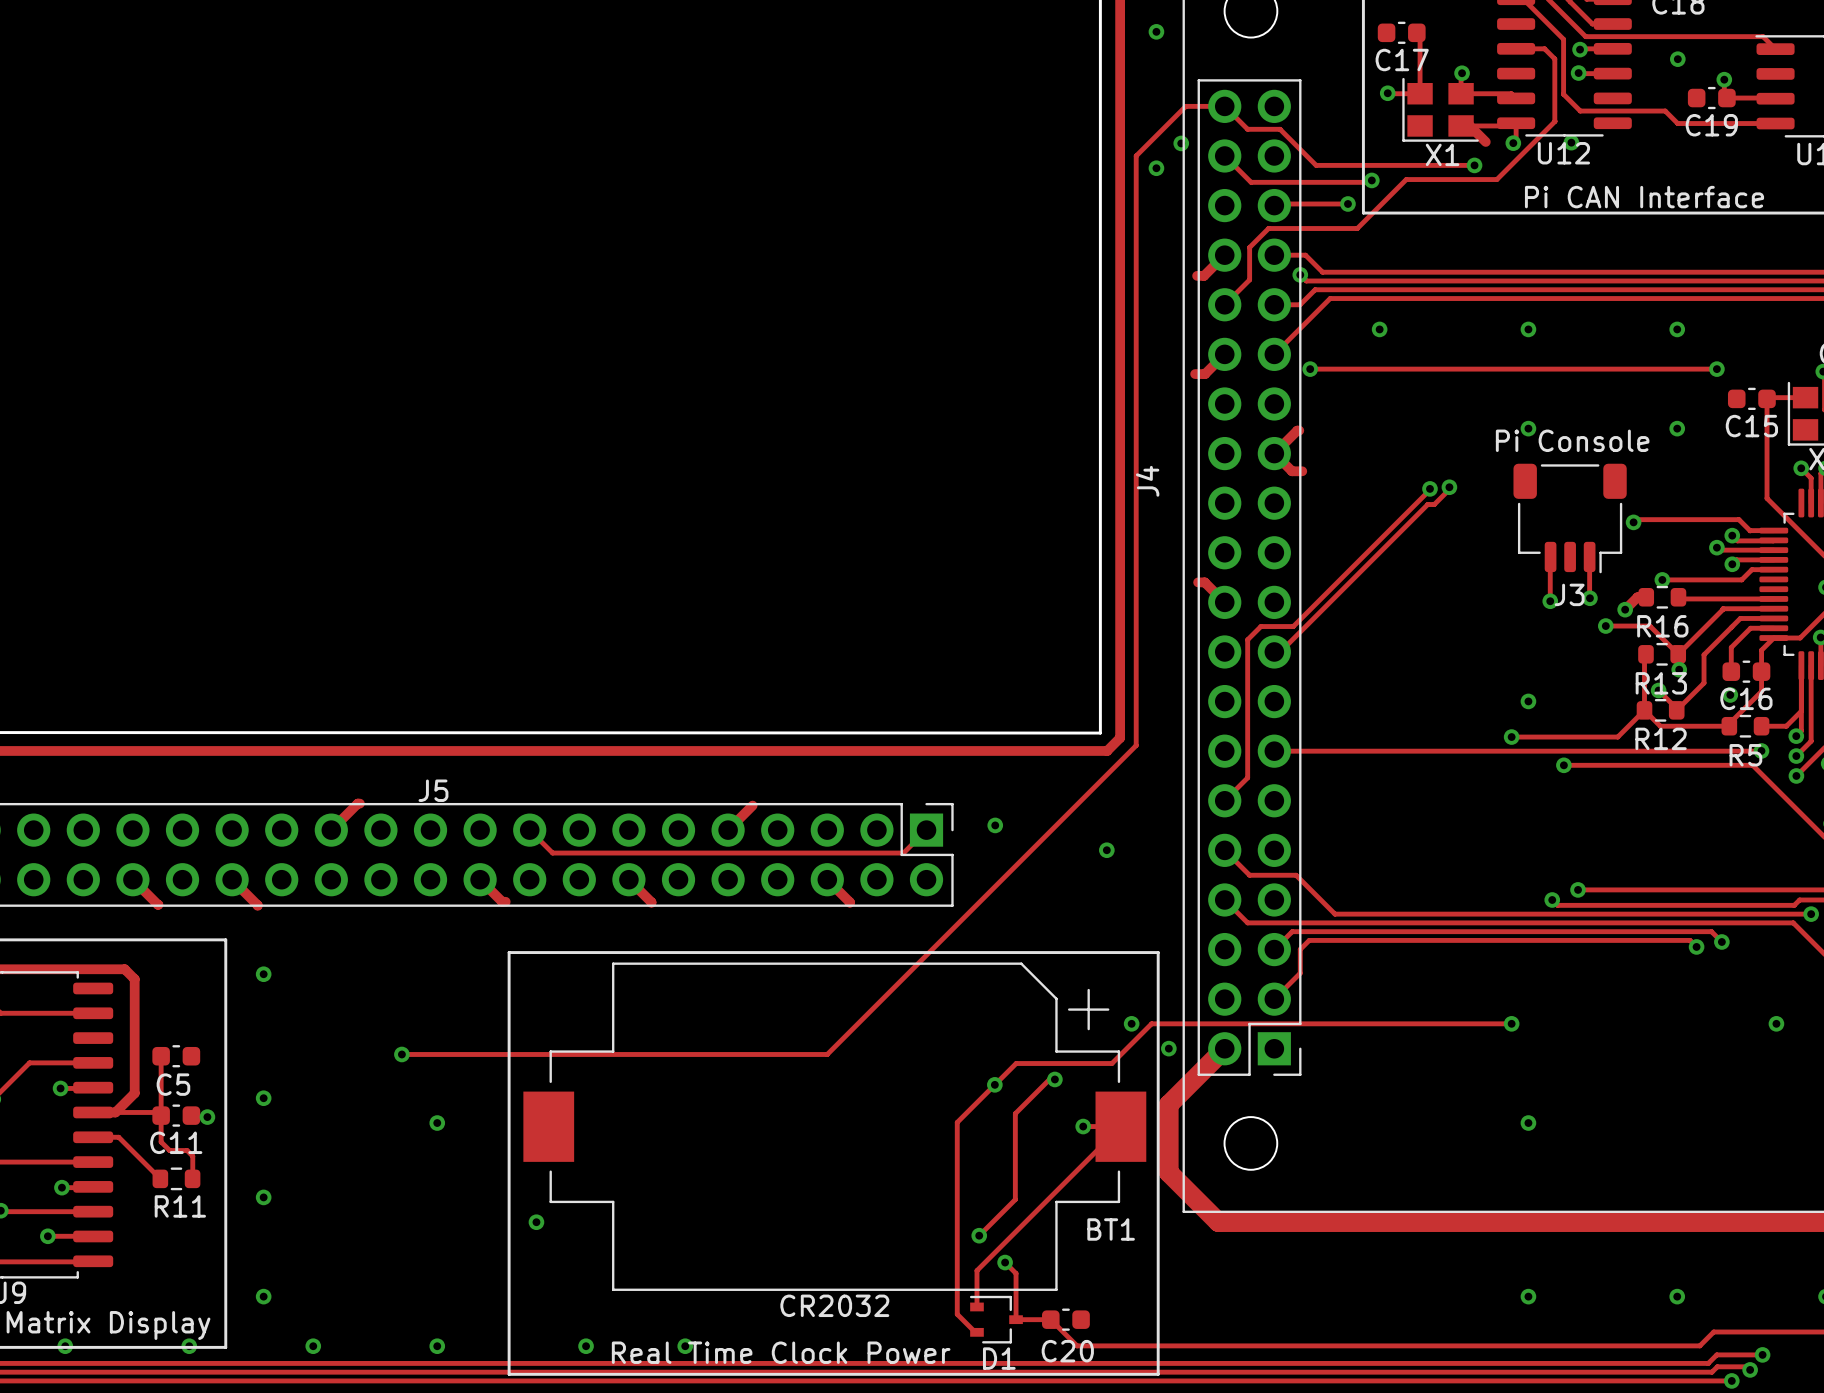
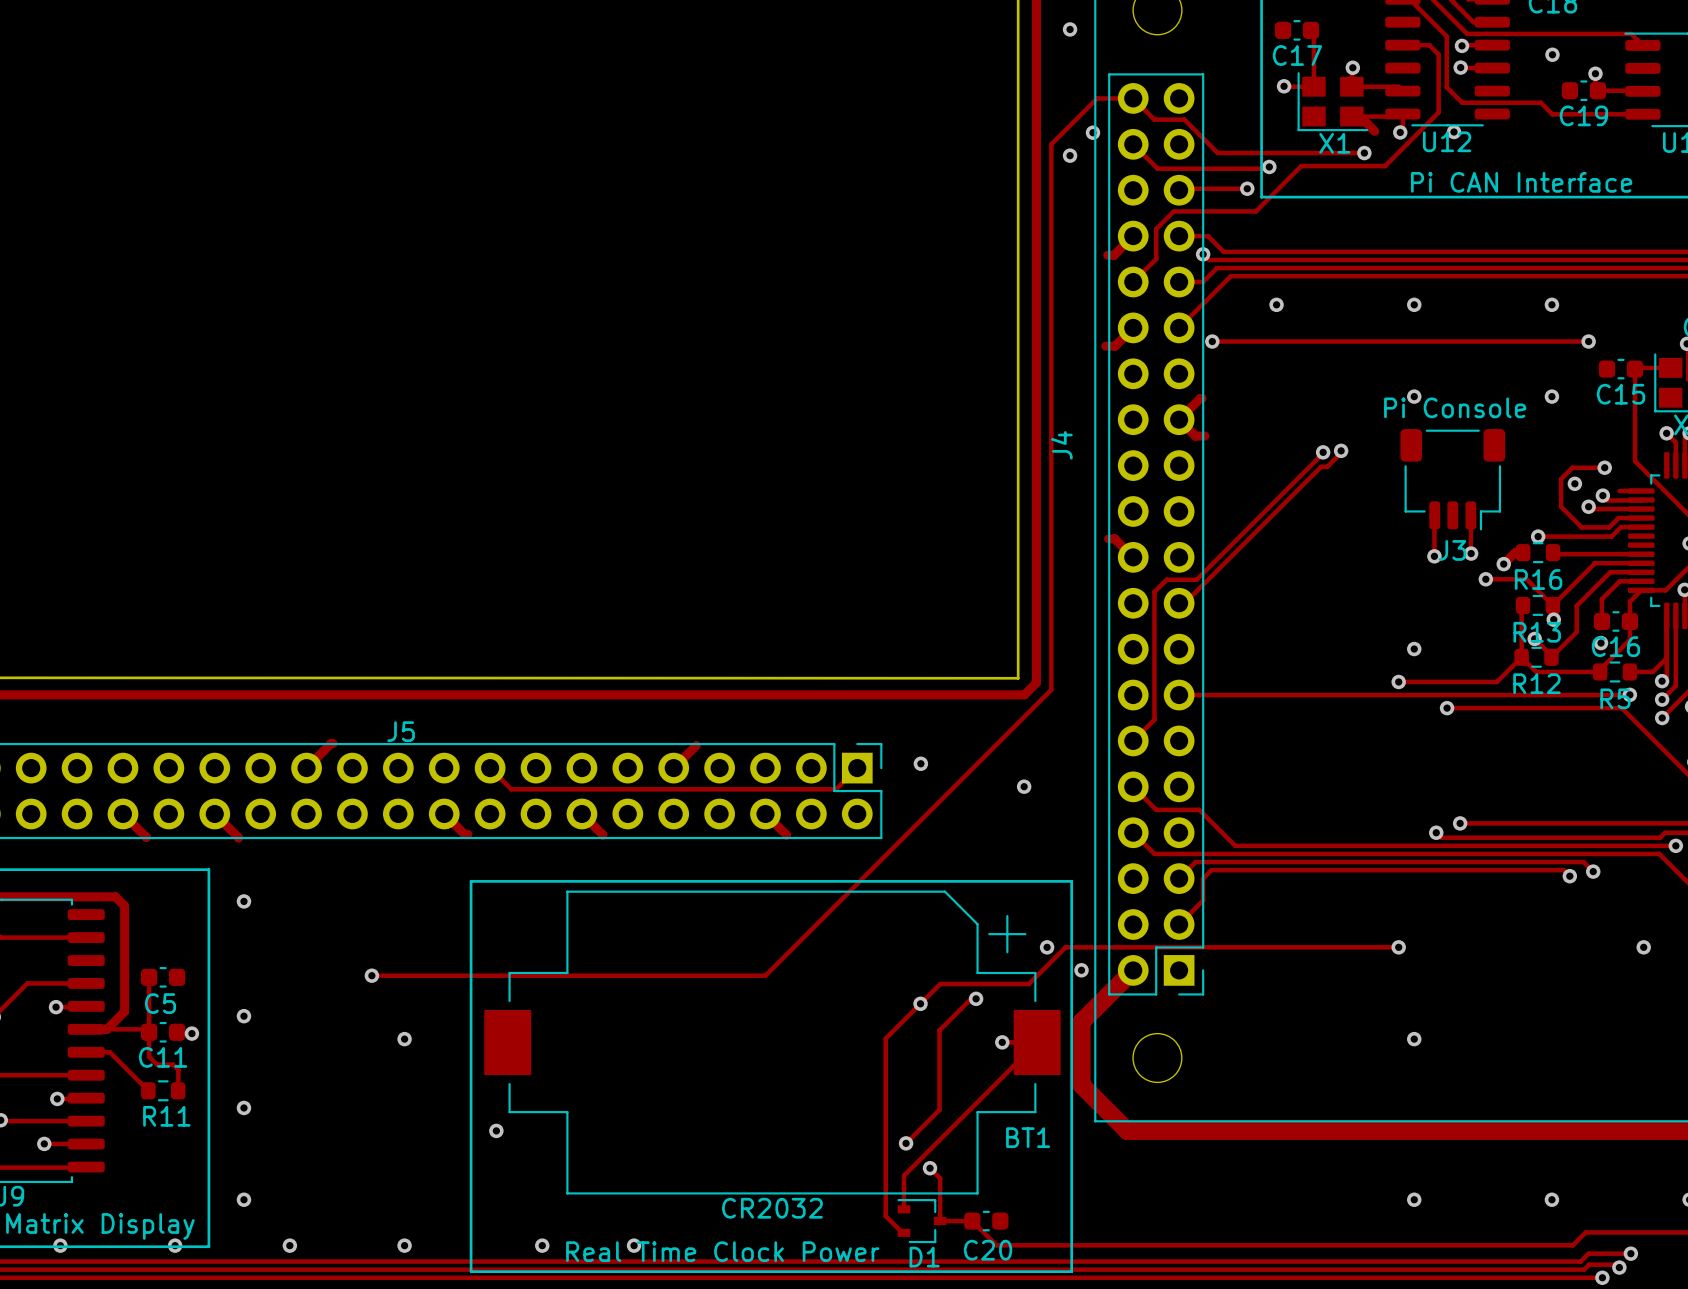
via: none -> (1604, 467)
track: (1633, 522) (1636, 519) (1738, 519) (1750, 530) -> none
via: (1633, 522) -> none
via: none -> (1574, 483)
track: (1749, 559) (1736, 559) (1732, 564) -> (1618, 518) (1609, 527) (1581, 527) (1561, 506) (1561, 479) (1572, 467) (1604, 467)
via: (1732, 564) -> none

